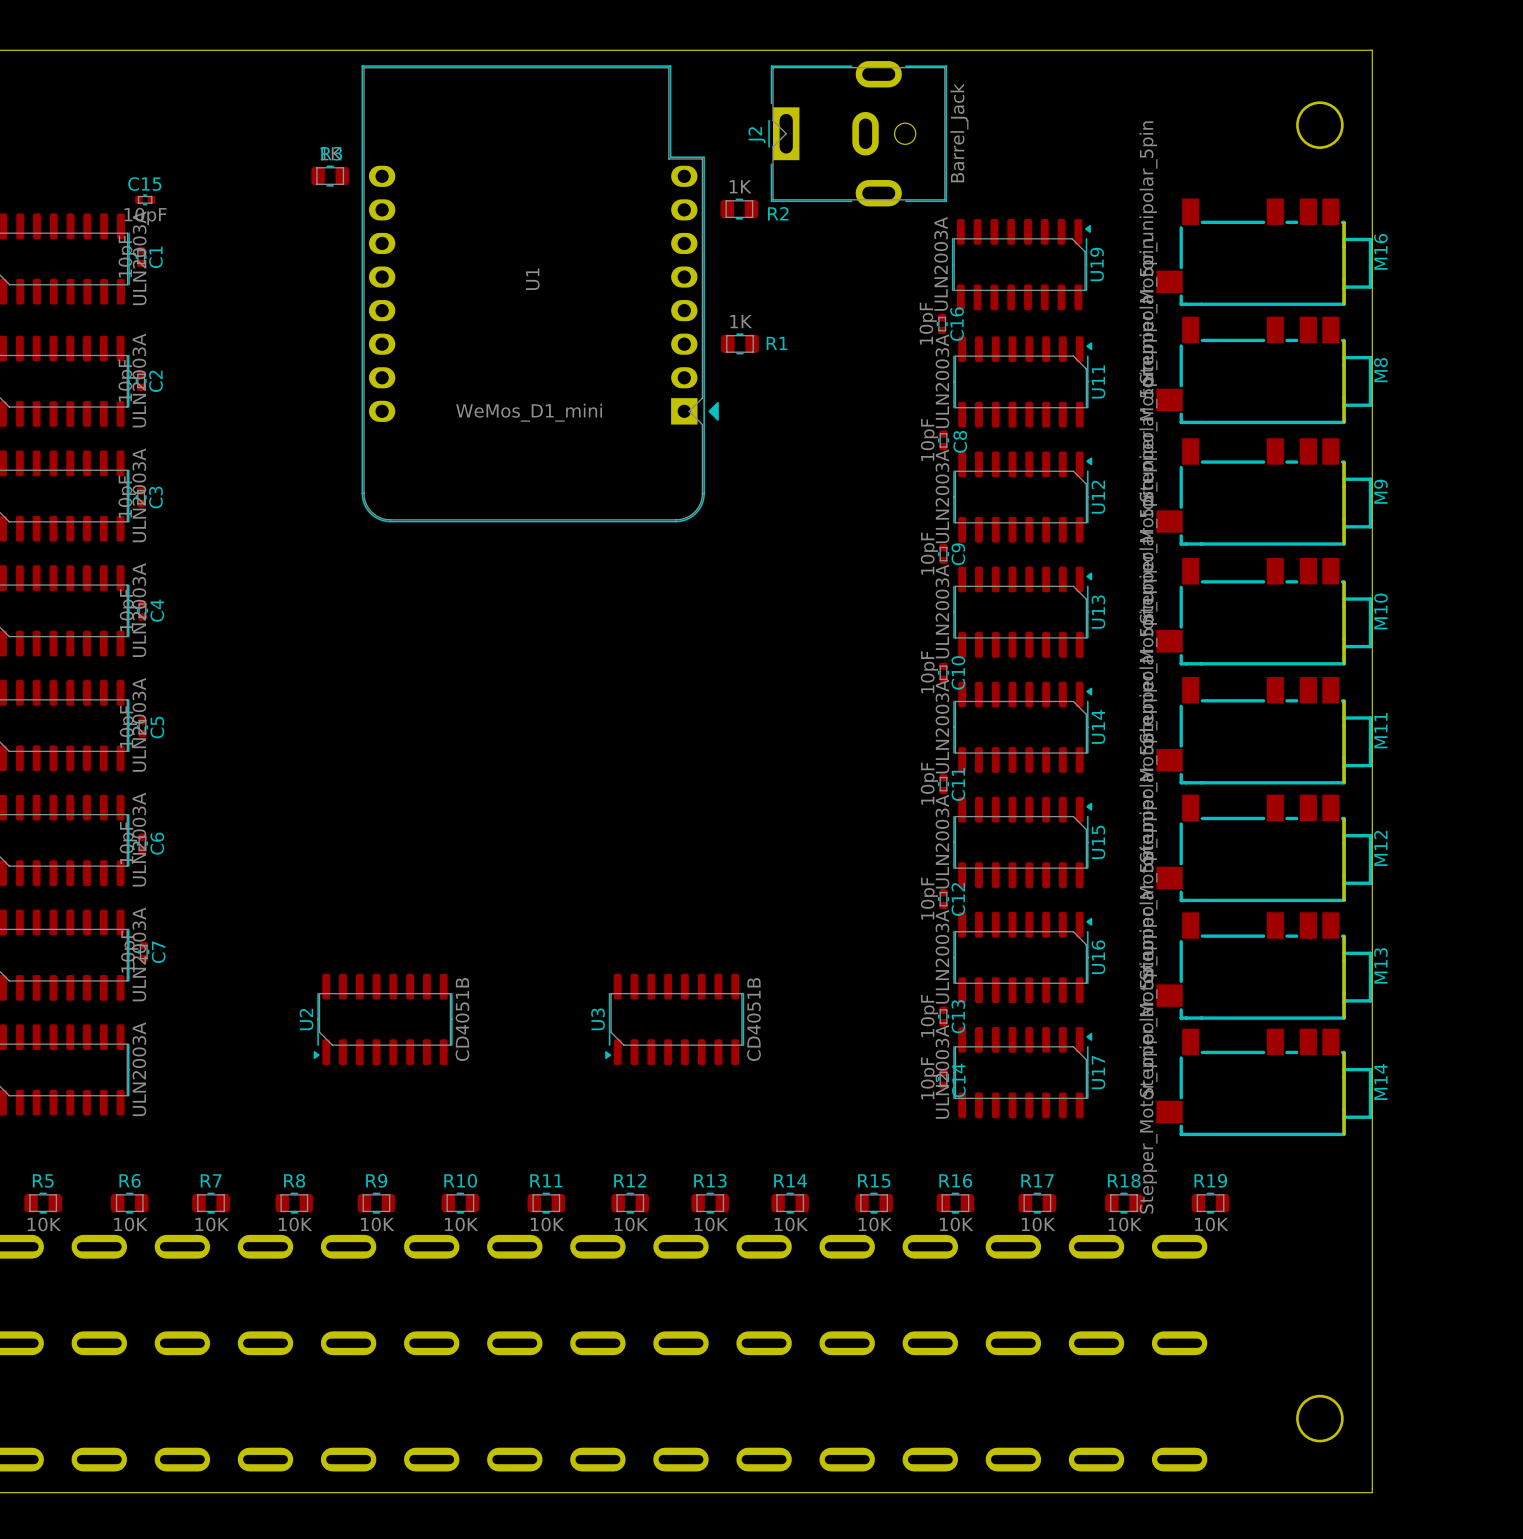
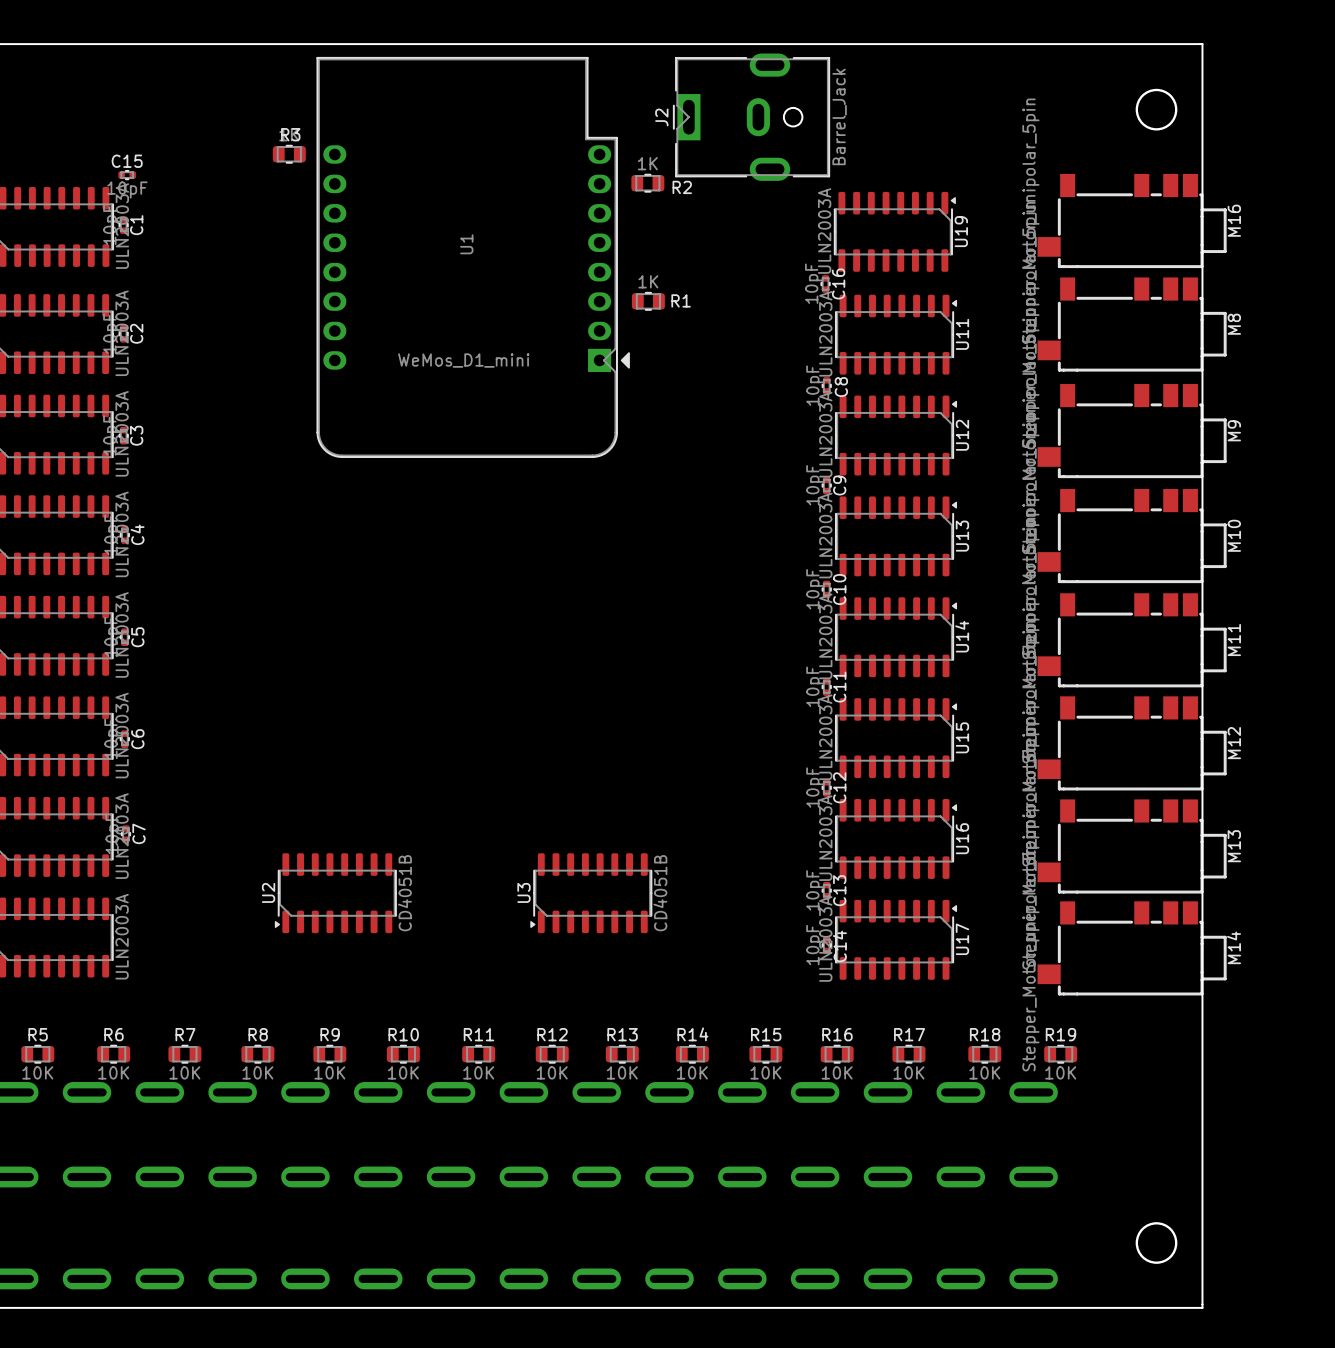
M16 footprint: [1156, 198, 1373, 306] -> [1037, 173, 1227, 269]
M8 footprint: [1156, 316, 1373, 425] -> [1037, 277, 1227, 372]
M9 footprint: [1156, 438, 1373, 546] -> [1037, 384, 1227, 479]
M10 footprint: [1156, 558, 1373, 666] -> [1037, 488, 1227, 584]
M11 footprint: [1156, 677, 1373, 785] -> [1037, 593, 1227, 688]
M12 footprint: [1156, 794, 1373, 903] -> [1037, 696, 1227, 791]
M13 footprint: [1156, 912, 1373, 1020] -> [1037, 799, 1227, 894]
M14 footprint: [1156, 1028, 1373, 1137] -> [1037, 901, 1227, 996]

